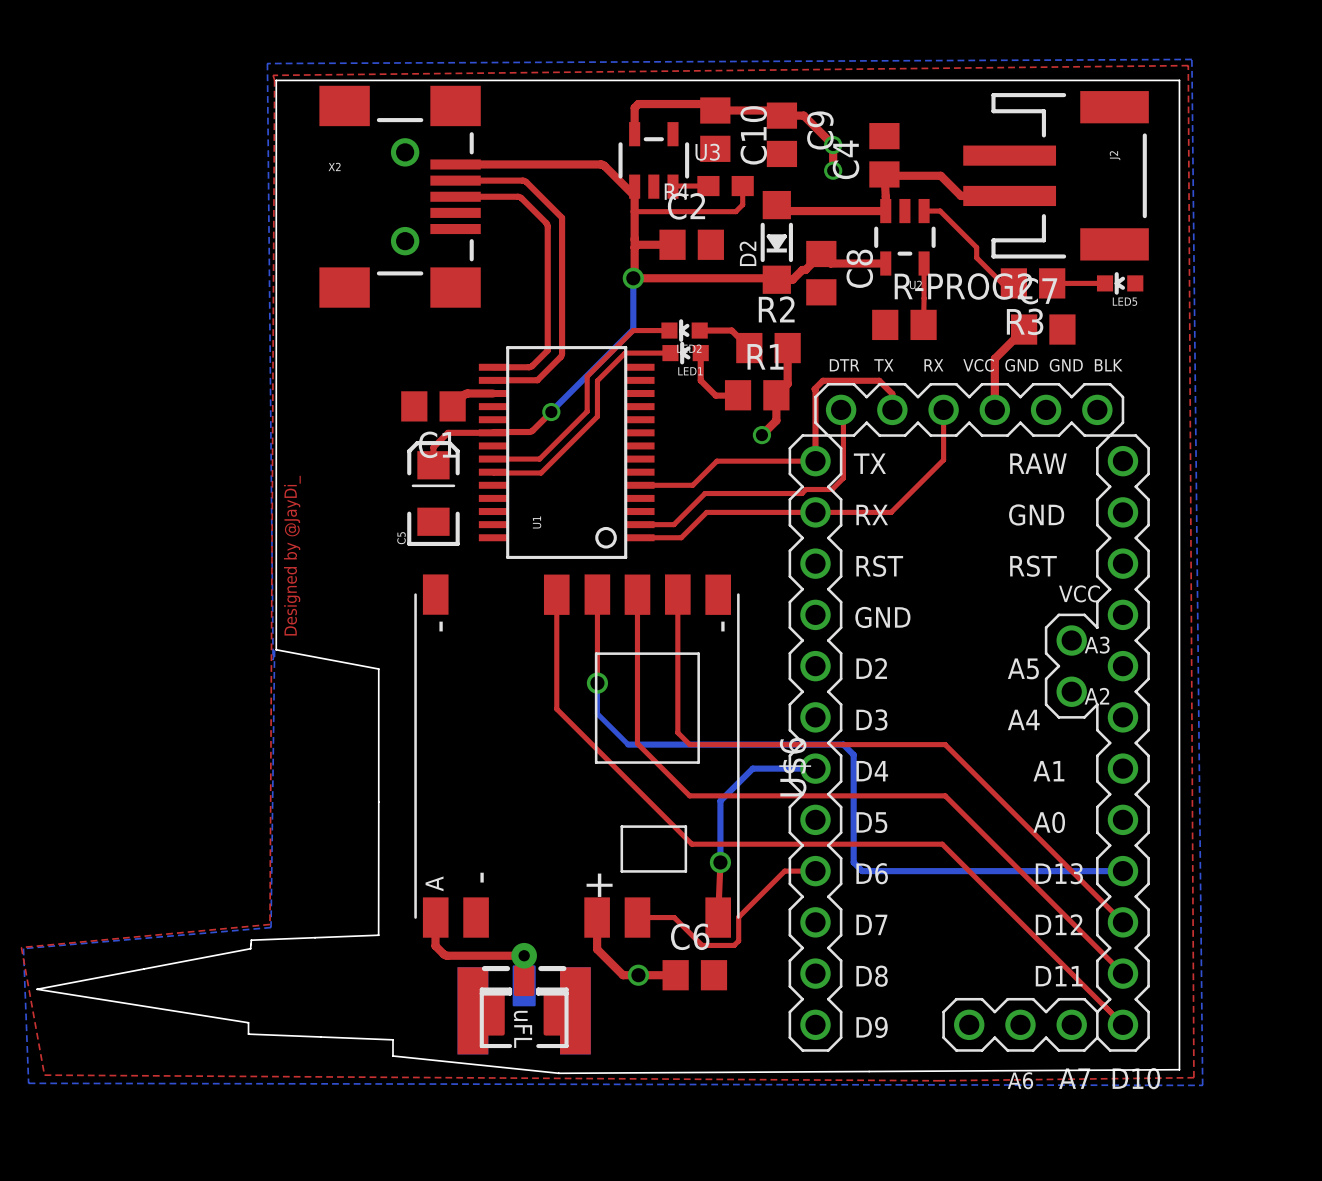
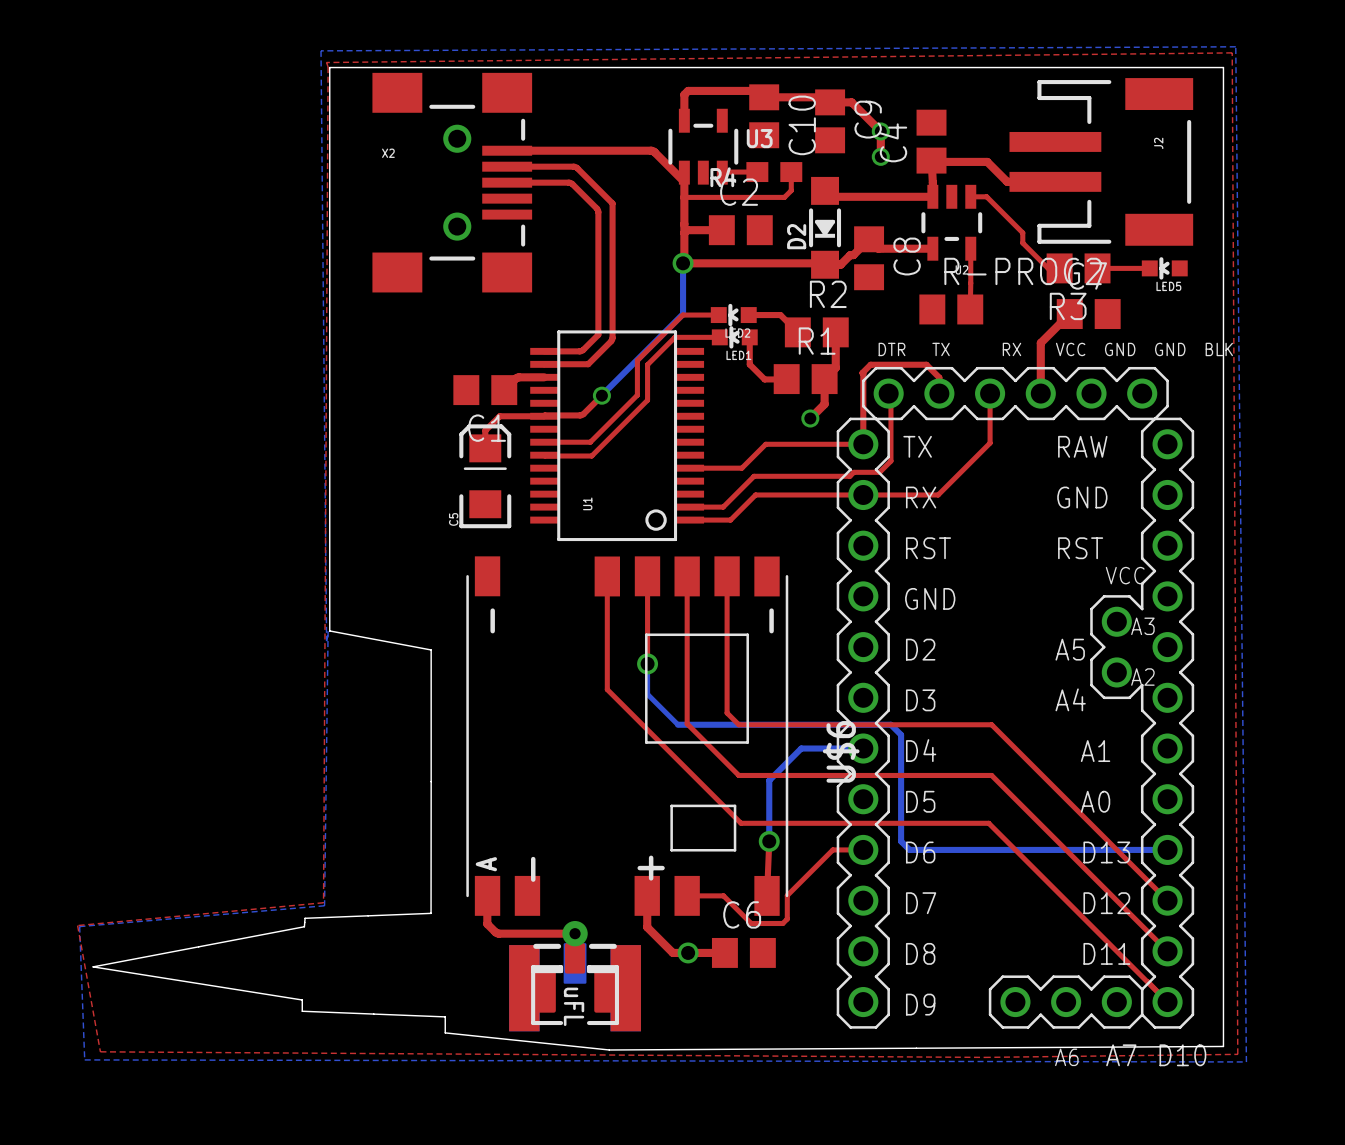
text: Designed by @JayDi_ (292, 555) -> none

